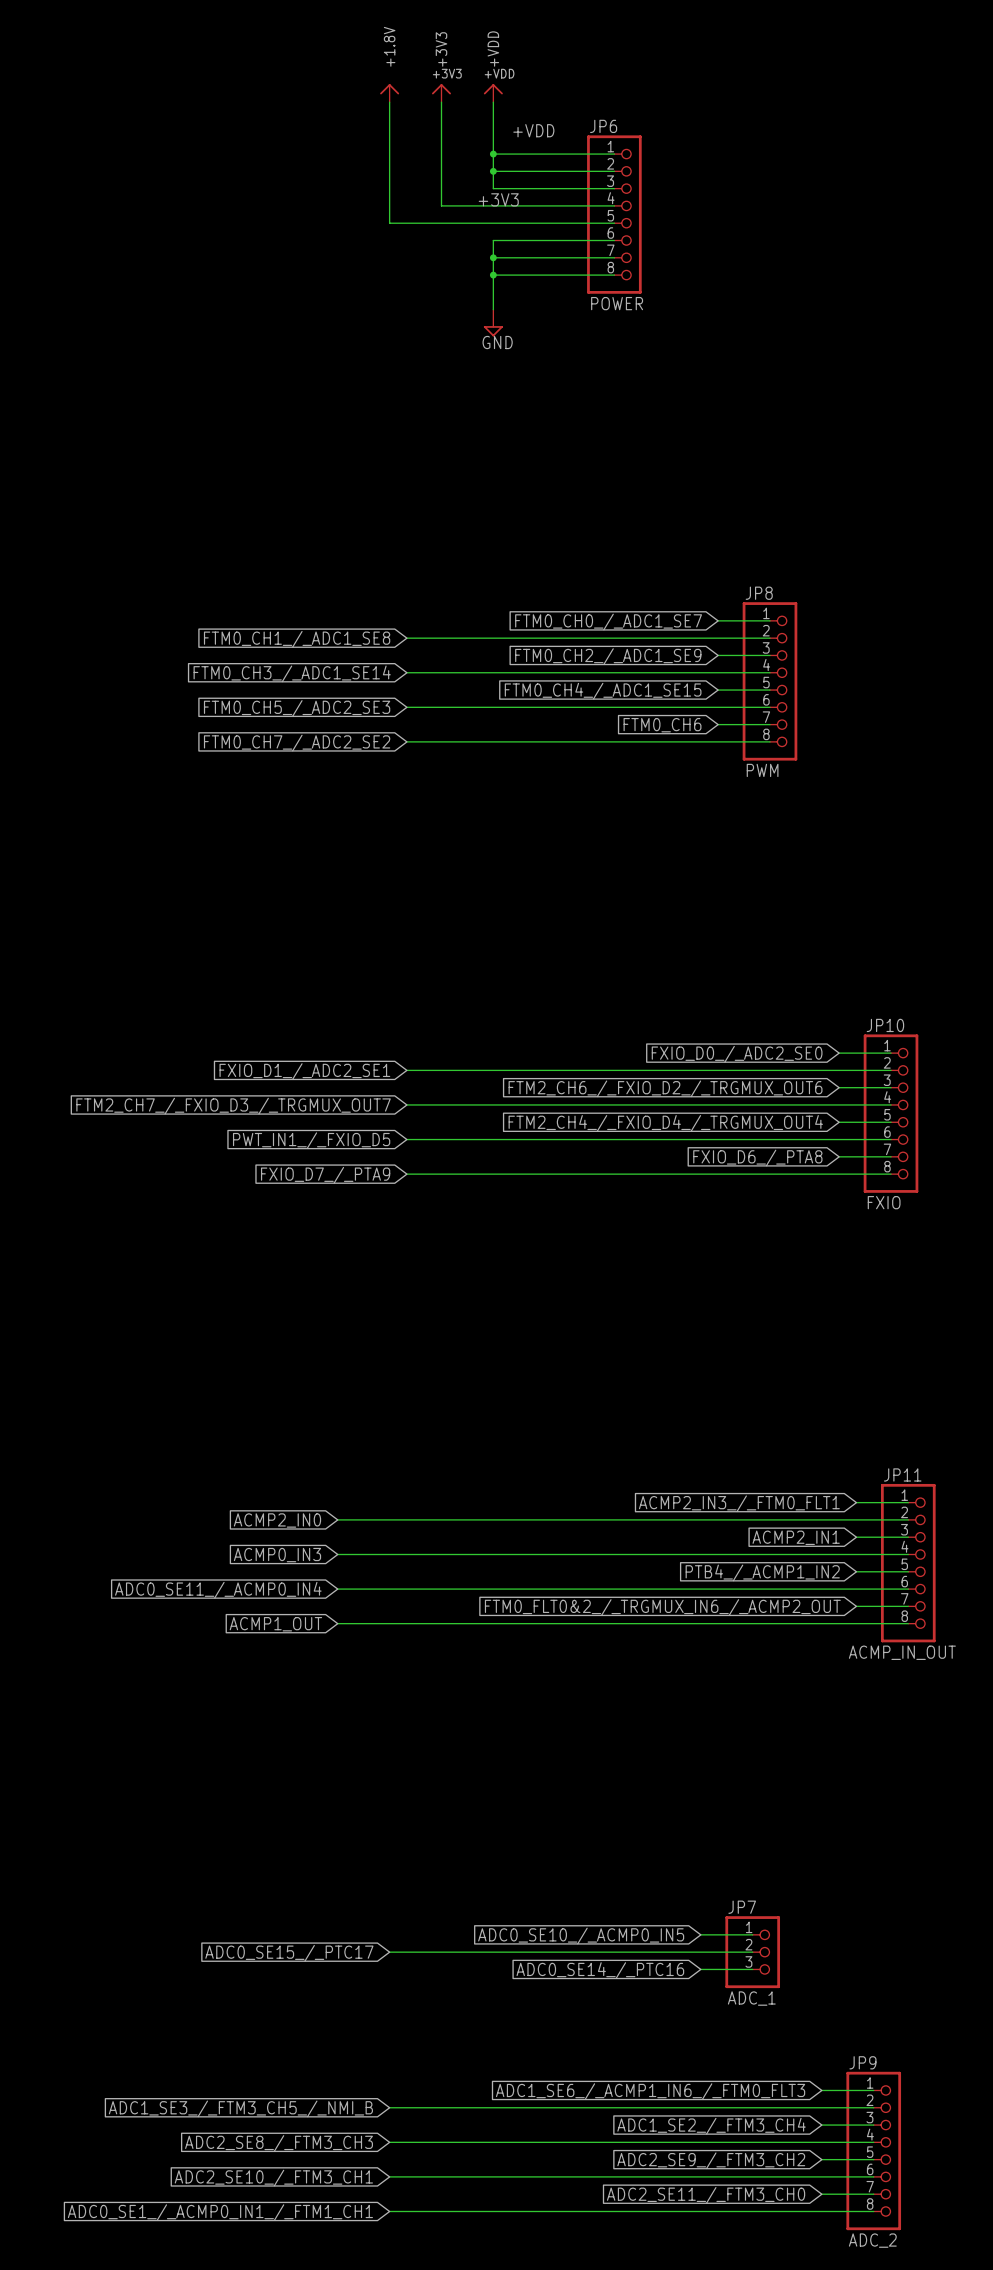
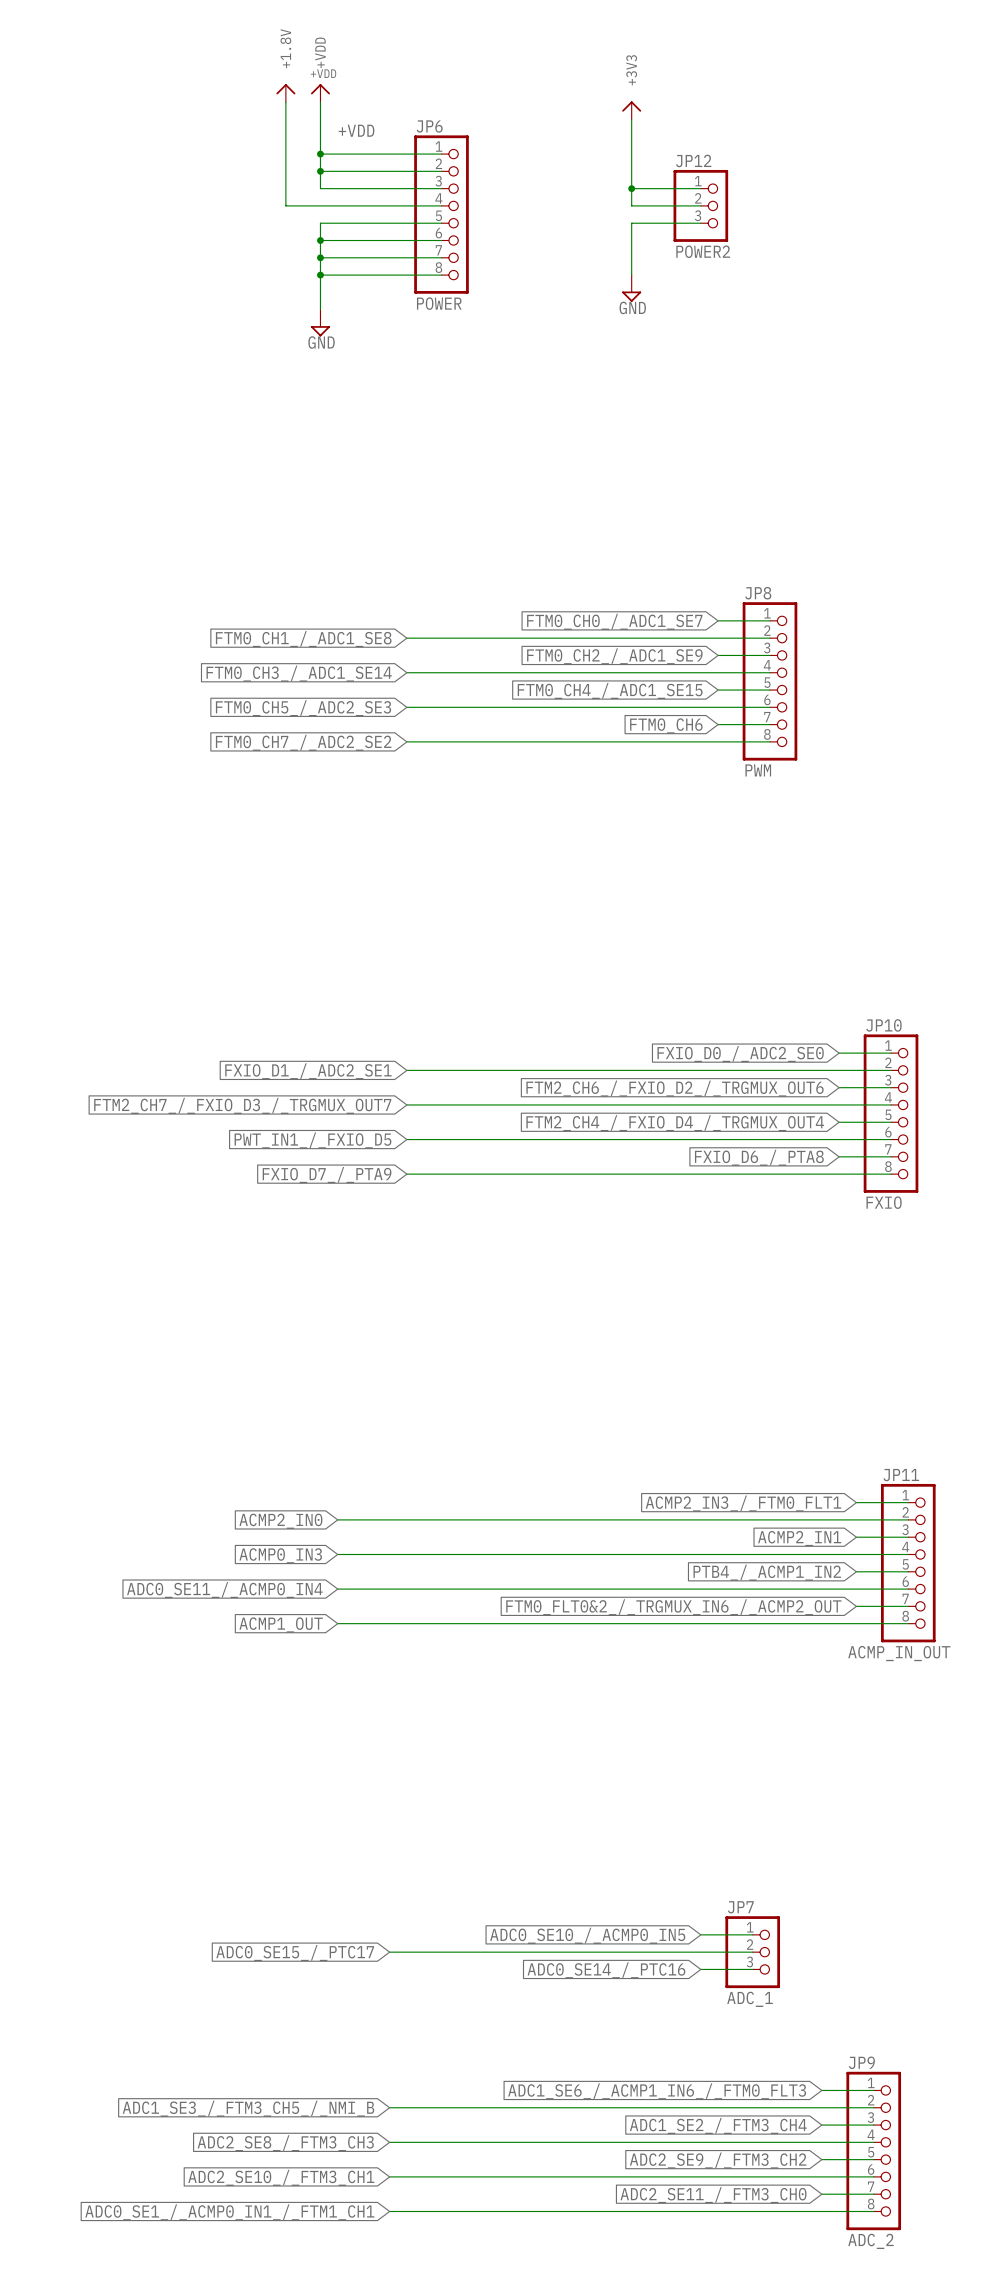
power symbol: none -> +VDD (320, 93)
power symbol position: (389, 93) -> (285, 93)
power symbol: +3V3 (441, 93) -> none
power symbol: +VDD (493, 93) -> none
wire: none -> (285, 102) (285, 205) (441, 205)
wire: none -> (320, 102) (320, 188) (441, 188)
wire: (389, 102) (389, 223) -> (320, 309) (320, 223) (389, 223)
wire: (441, 102) (441, 205) (614, 205) -> none
wire: (493, 102) (493, 188) (614, 188) -> none
power symbol: none -> (631, 110)
wire: none -> (631, 119) (631, 205) (700, 205)
label: none -> +VDD (356, 130)
label: +VDD (533, 130) -> none
wire: none -> (320, 154) (441, 154)
junction: none -> (320, 154)
wire: (493, 154) (614, 154) -> none
junction: (493, 154) -> none
wire: none -> (320, 171) (441, 171)
junction: none -> (320, 171)
wire: (493, 171) (614, 171) -> none
junction: (493, 171) -> none
wire: none -> (631, 188) (700, 188)
junction: none -> (631, 188)
label: +3V3 (498, 199) -> none
JP12: none -> POWER2 (700, 205)
JP6 position: (614, 214) -> (441, 214)
wire: (441, 223) (614, 223) -> none
wire: none -> (700, 223) (631, 223) (631, 275)
wire: none -> (320, 240) (441, 240)
junction: none -> (320, 240)
wire: (614, 240) (493, 240) (493, 309) -> none
wire: none -> (320, 257) (441, 257)
junction: none -> (320, 257)
wire: (493, 257) (614, 257) -> none
junction: (493, 257) -> none
wire: none -> (320, 275) (441, 275)
junction: none -> (320, 275)
wire: (493, 275) (614, 275) -> none
junction: (493, 275) -> none
power symbol: none -> GND (631, 288)
power symbol: none -> GND (320, 323)
power symbol: GND (493, 323) -> none

